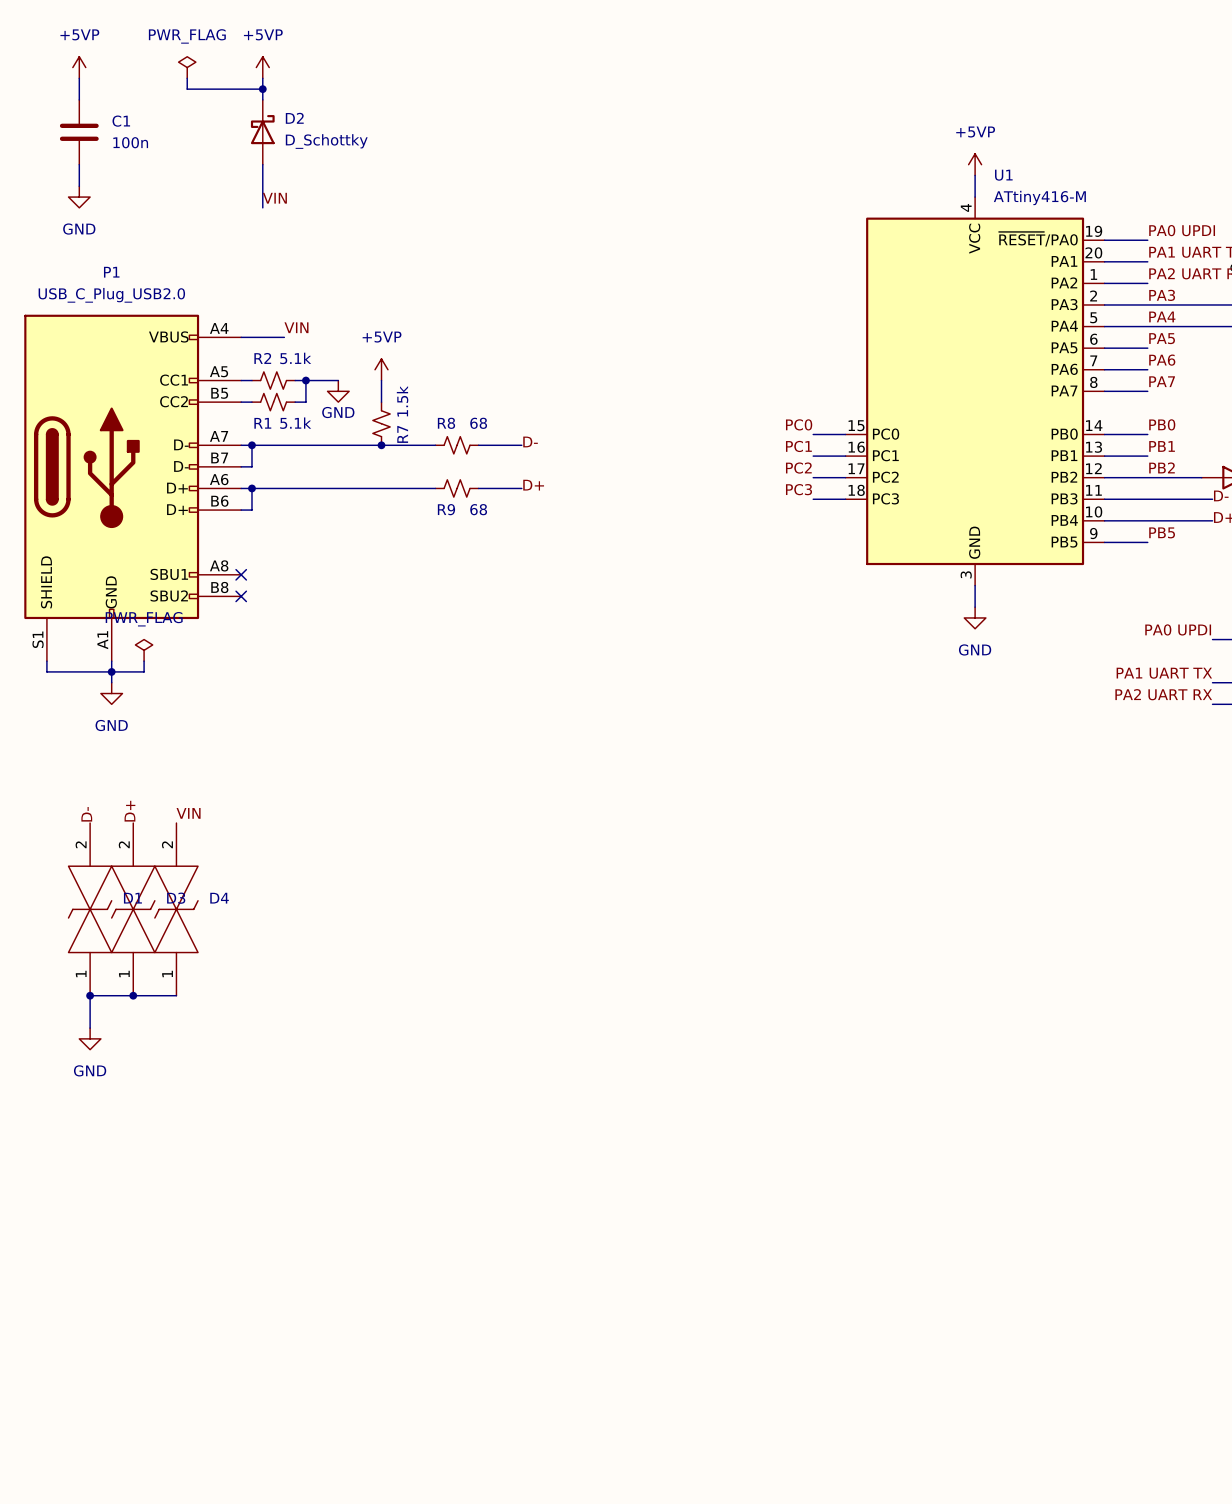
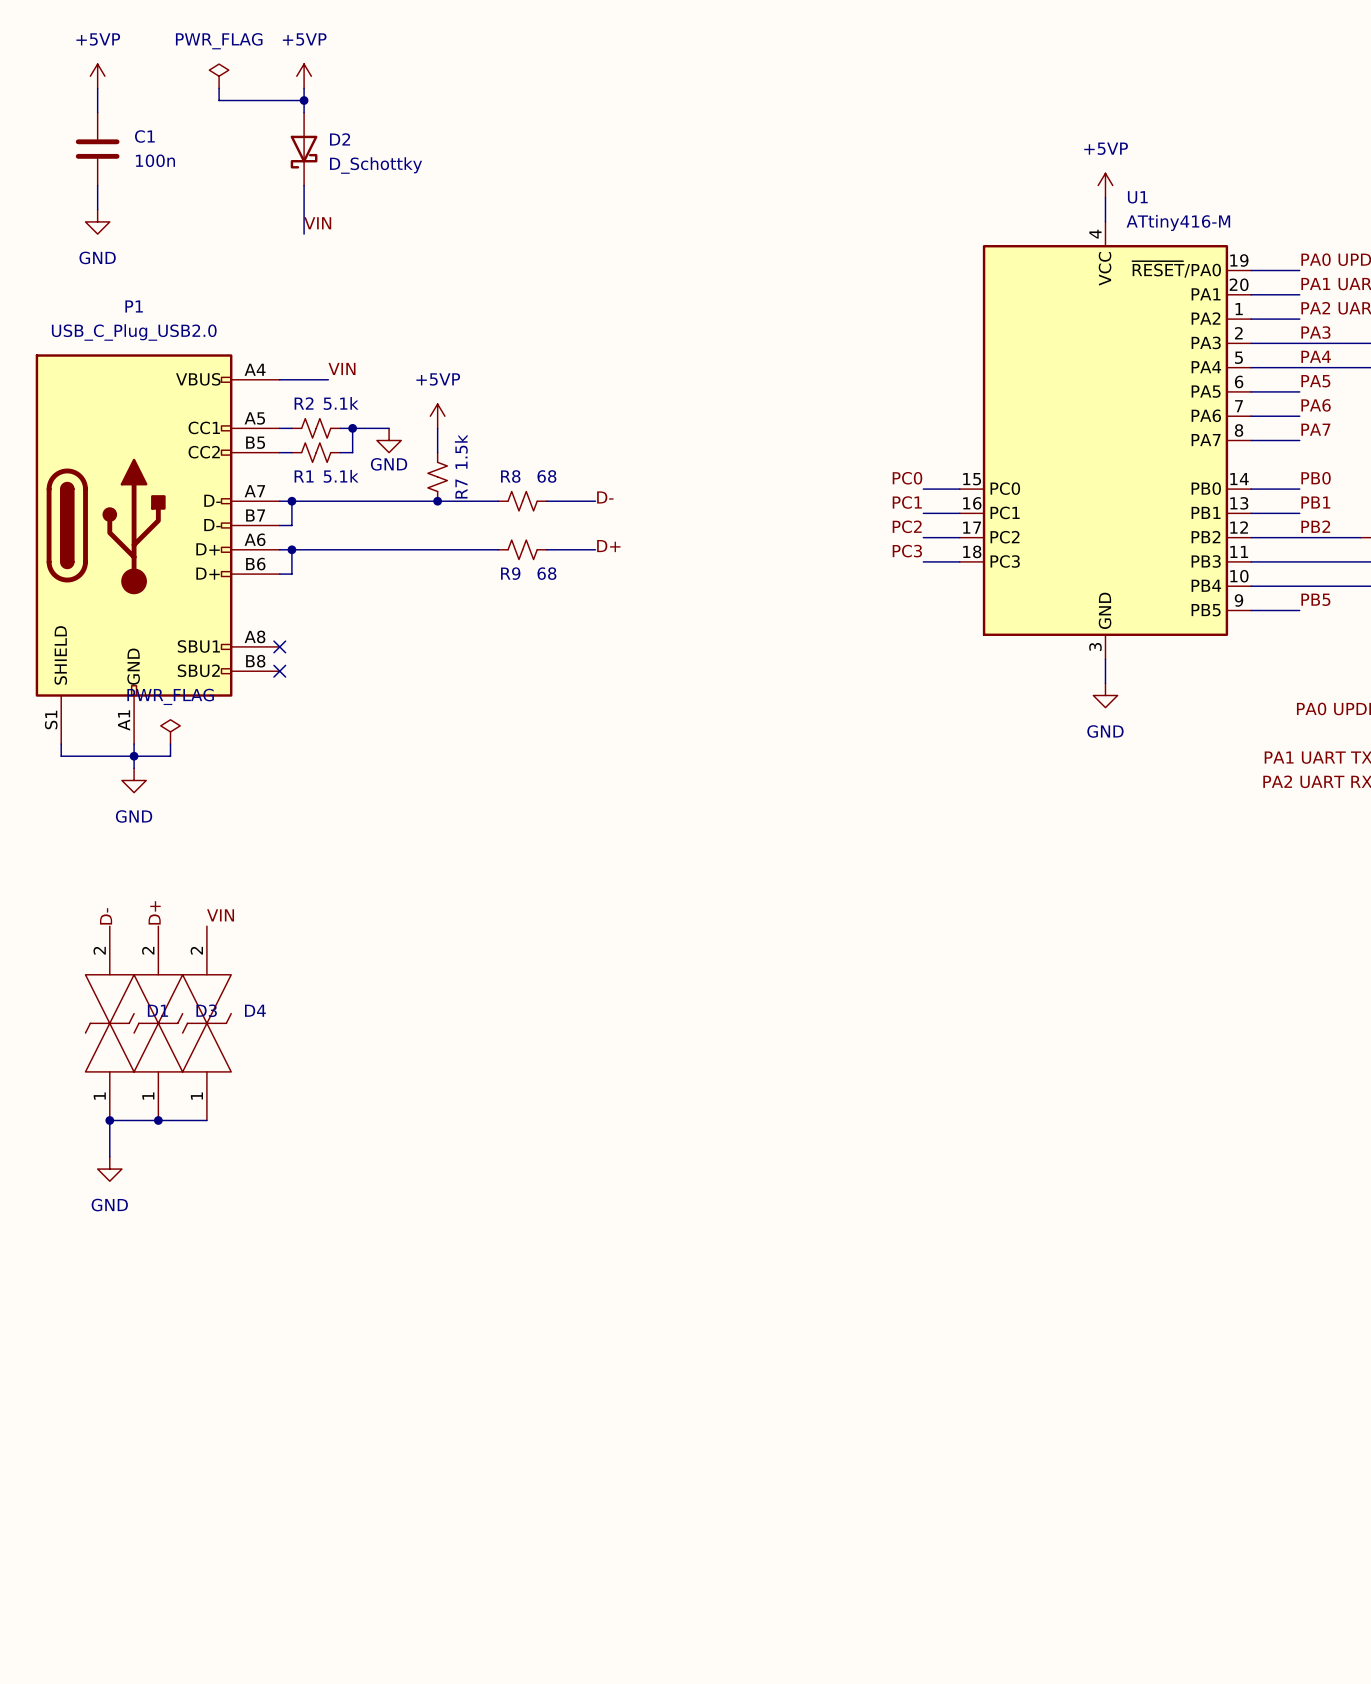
D2 rotation: 0° (262, 129) -> 180° (304, 152)

